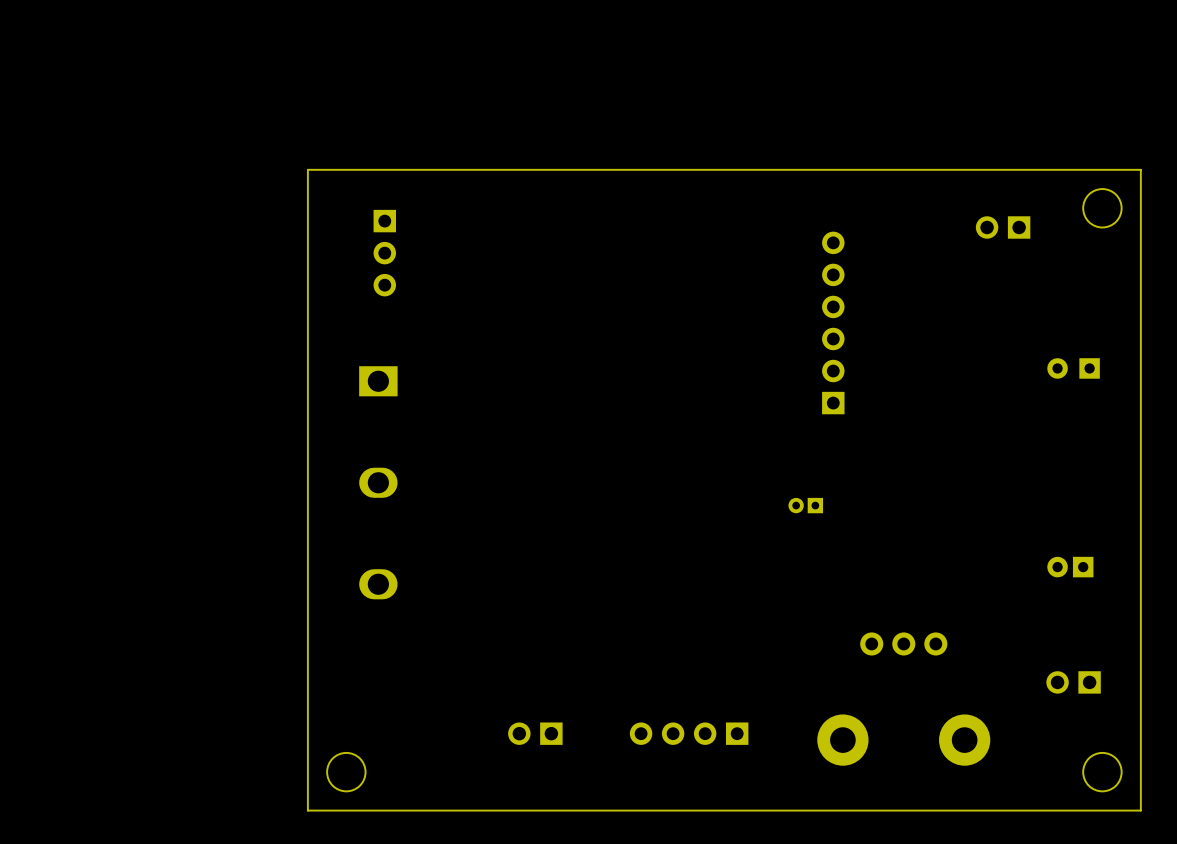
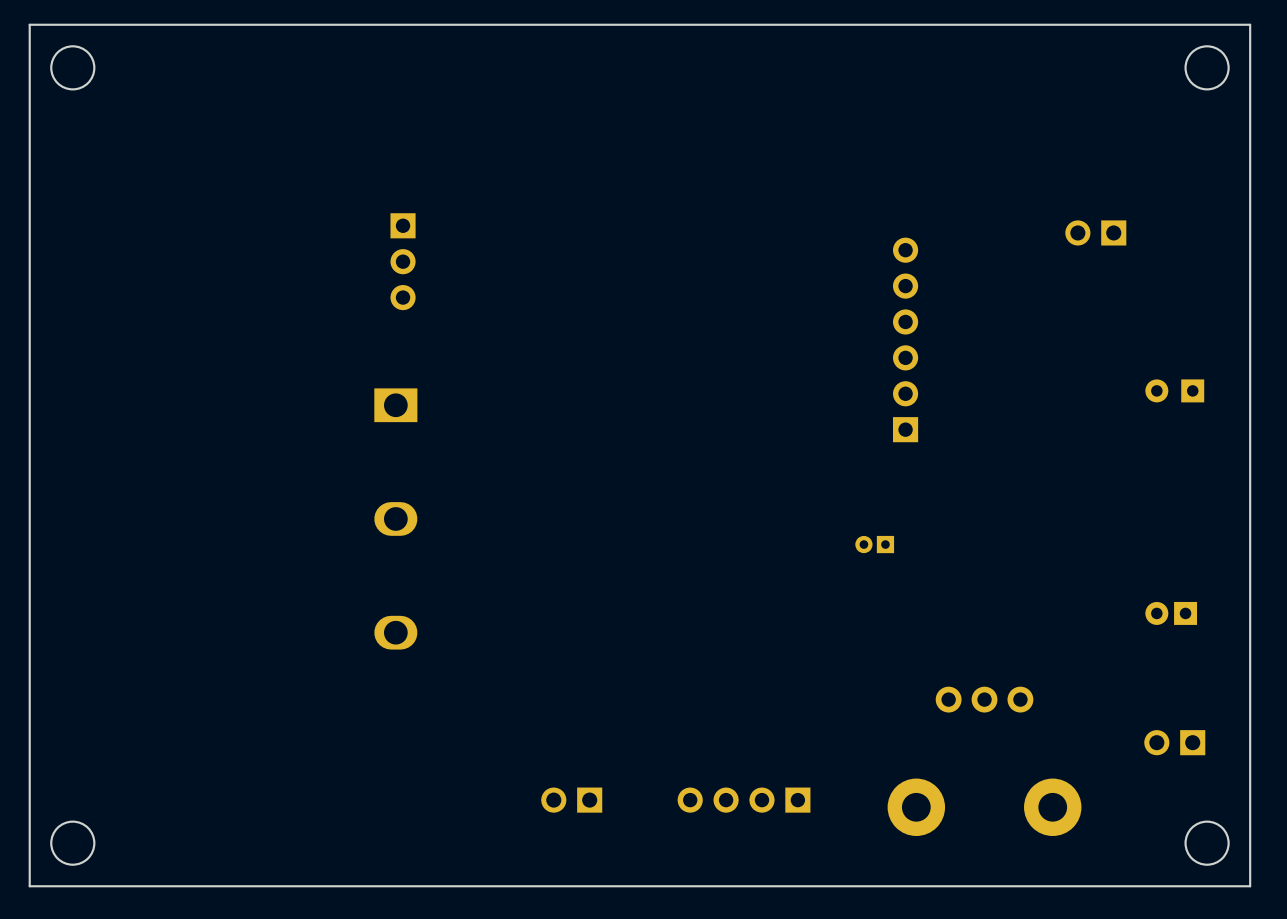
round board edge: none -> [50, 45, 96, 91]
board edge: (1140, 169) (307, 169) (307, 810) -> (1250, 168) (1250, 24) (29, 24) (29, 886) (316, 886)
round board edge position: (1102, 208) -> (1207, 67)
round board edge position: (346, 772) -> (72, 843)

